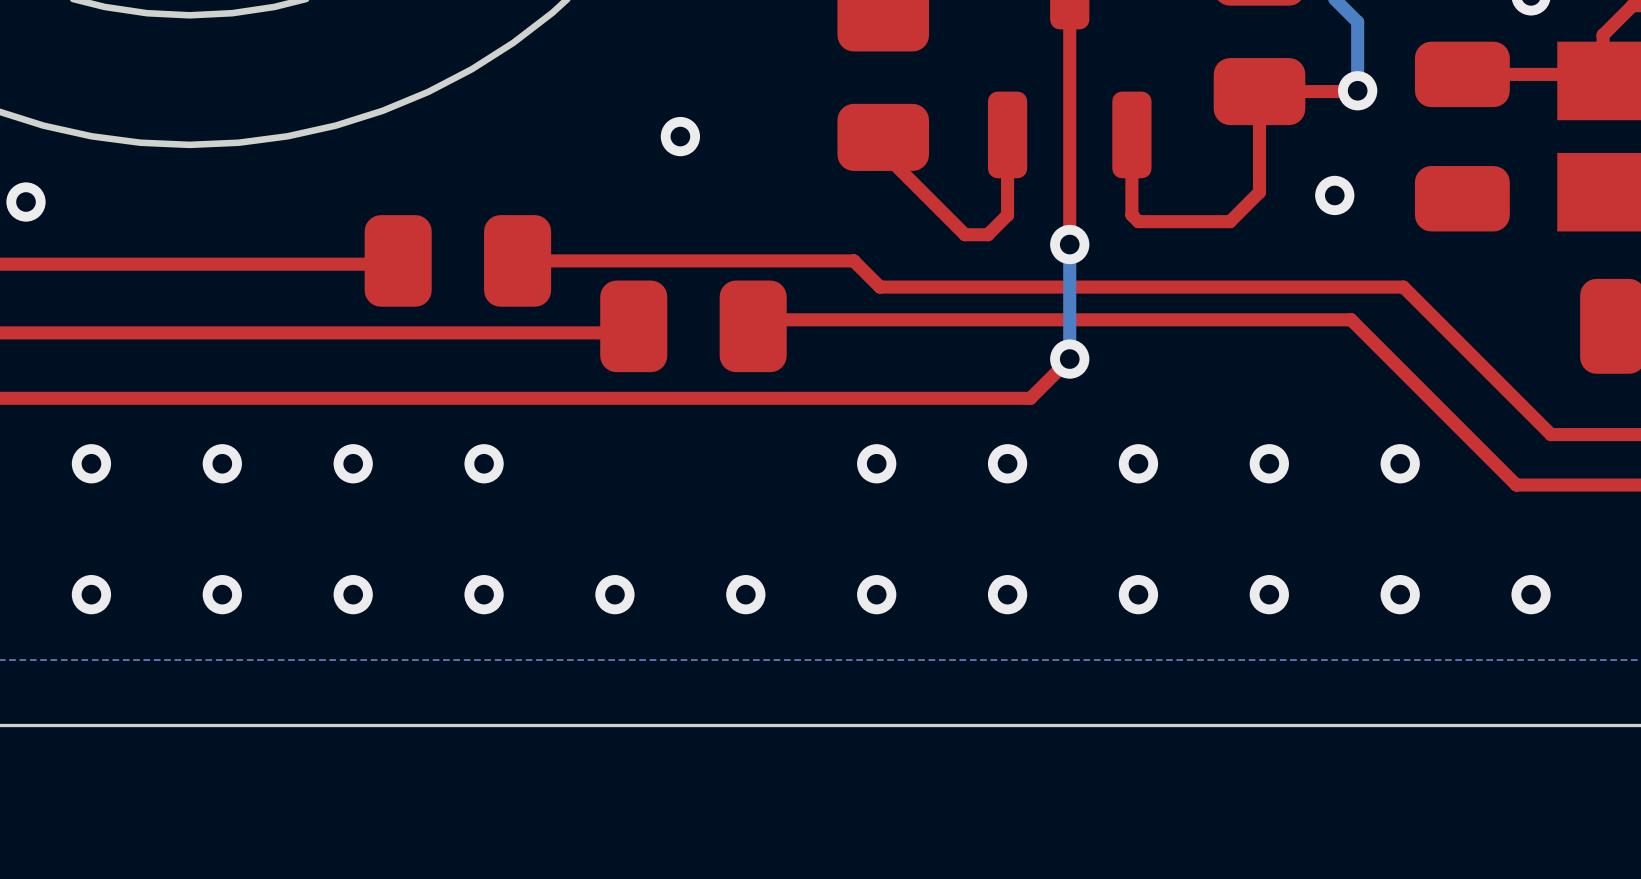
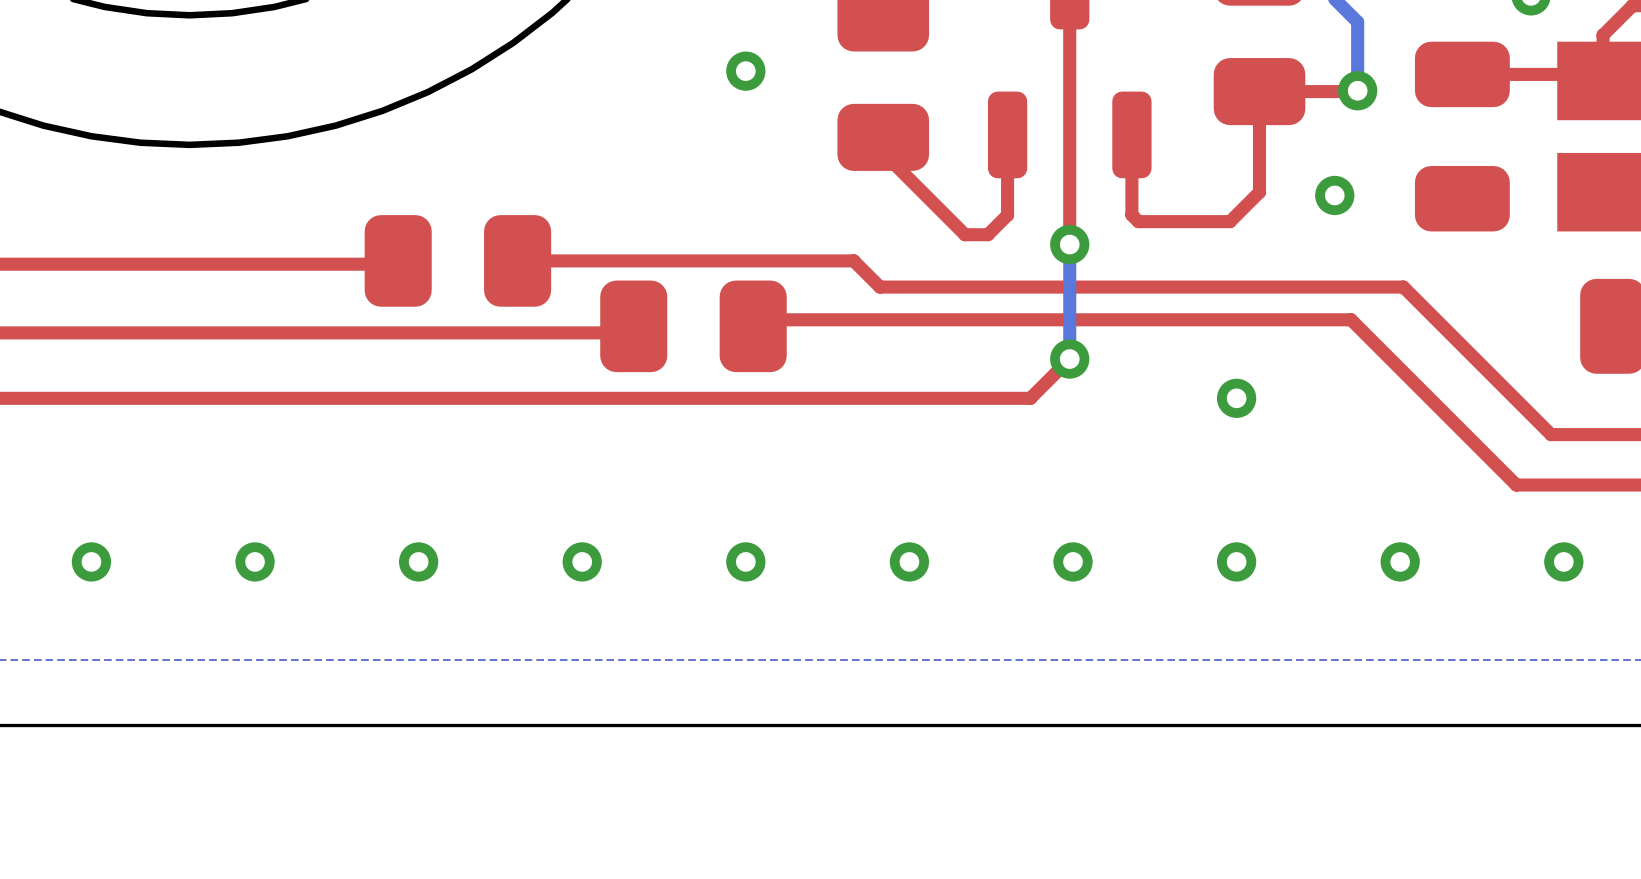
via: none -> (745, 71)
via: (680, 136) -> none
via: (26, 202) -> none
via: none -> (1236, 398)
via: (91, 463) -> none
via: (222, 463) -> none
via: (353, 463) -> none
via: (484, 463) -> none
via: (876, 463) -> none
via: (1007, 463) -> none
via: (1138, 463) -> none
via: (1269, 463) -> none
via: (1400, 463) -> none
via: none -> (418, 561)
via: none -> (1073, 561)
via position: (91, 594) -> (91, 561)
via position: (222, 594) -> (255, 561)
via: (353, 594) -> none
via: (484, 594) -> none
via position: (614, 594) -> (582, 561)
via position: (745, 594) -> (745, 561)
via position: (876, 594) -> (909, 561)
via: (1007, 594) -> none
via: (1138, 594) -> none
via position: (1269, 594) -> (1236, 561)
via position: (1400, 594) -> (1400, 561)
via position: (1531, 594) -> (1563, 561)

